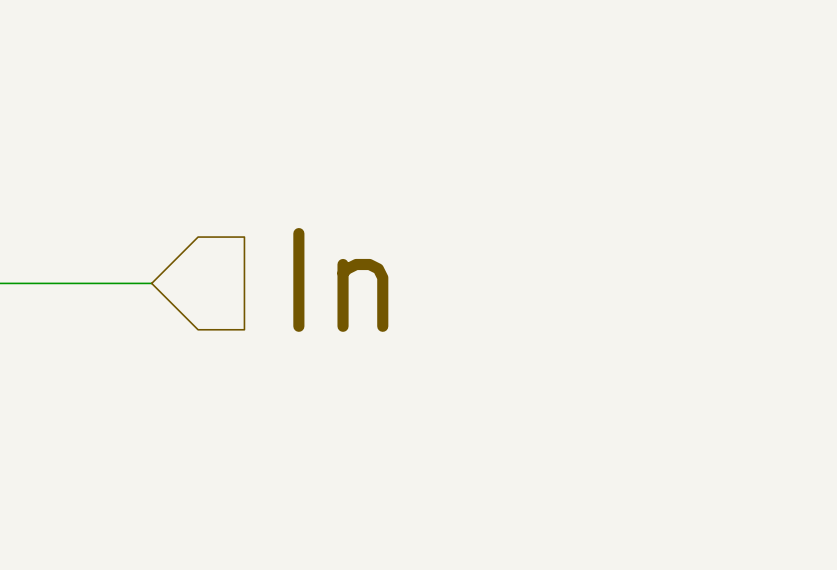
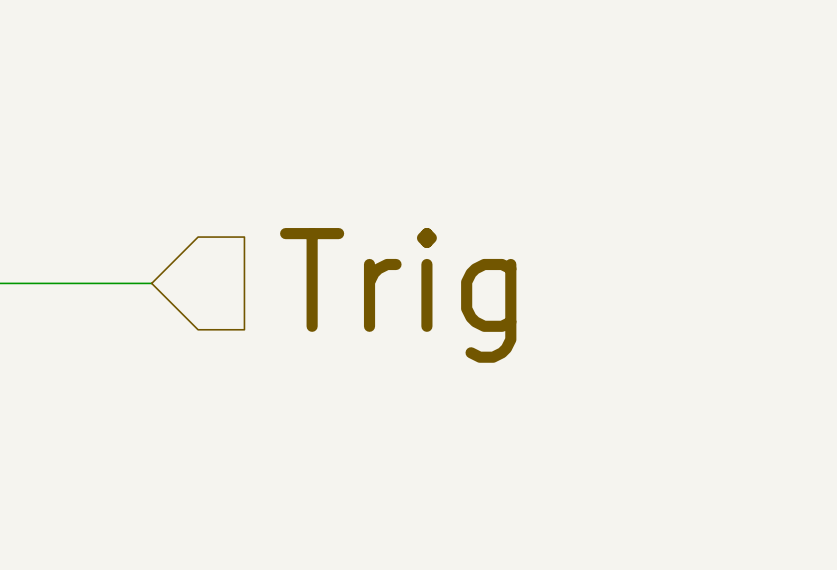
hierarchical label: In (340, 279) -> Trig (398, 295)

